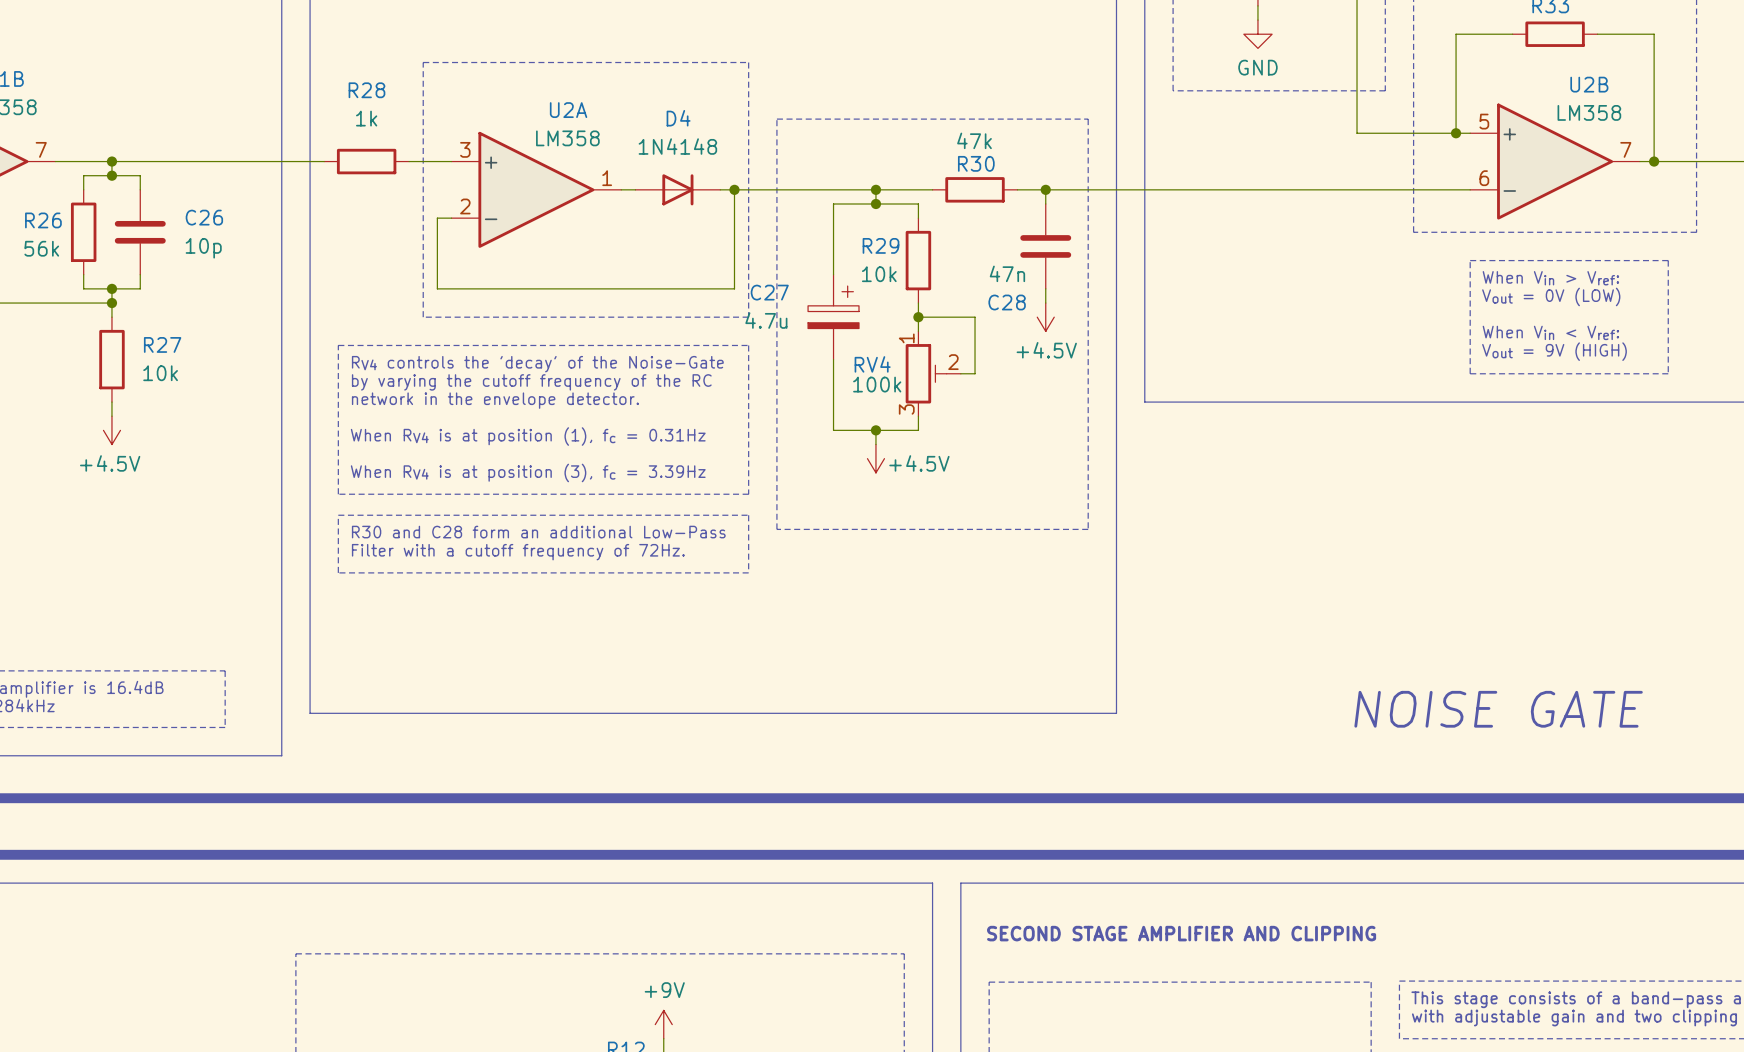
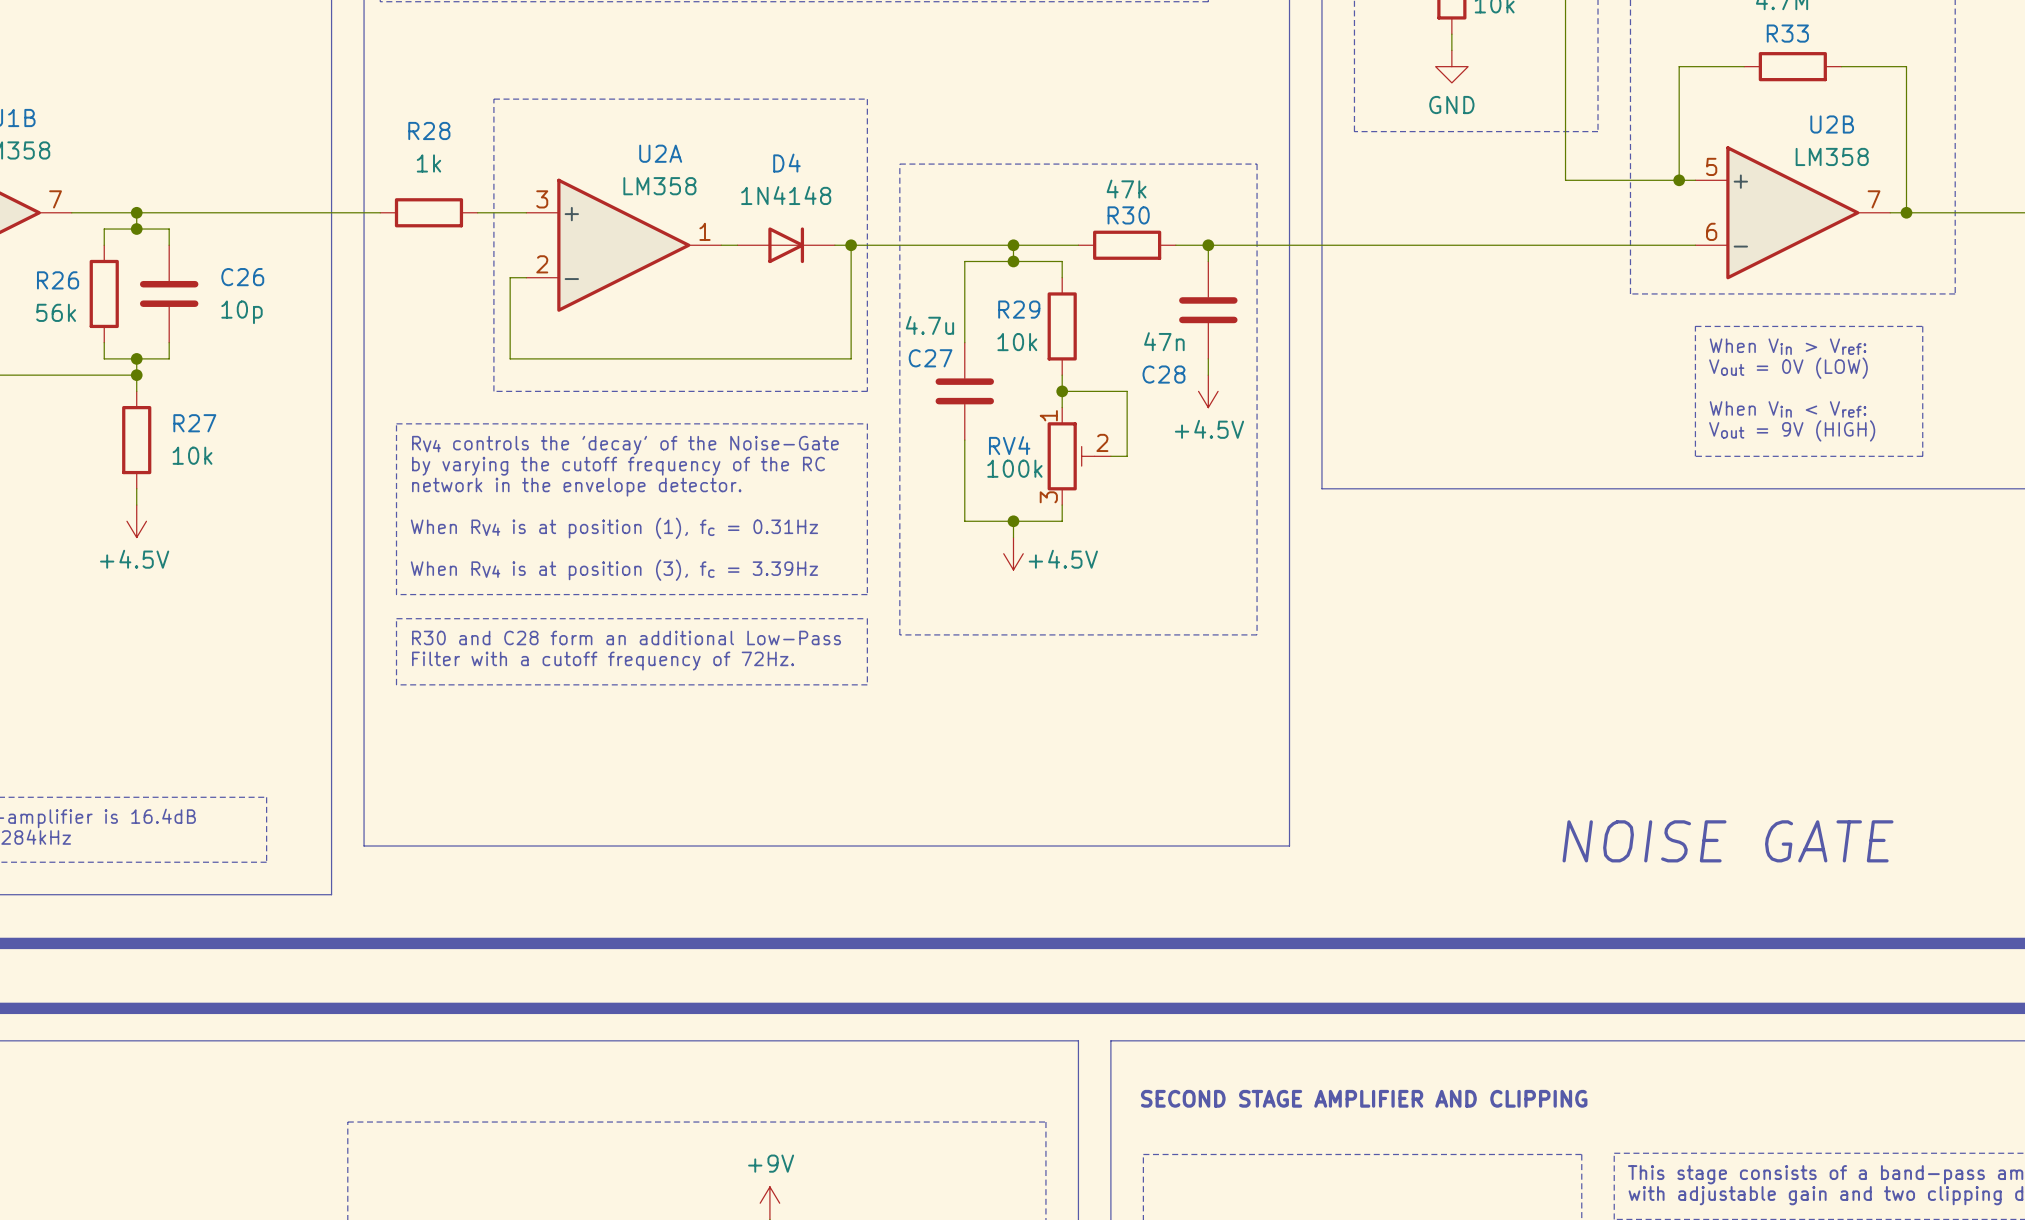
C27 symbol: [808, 274, 859, 360] -> [935, 342, 995, 441]
C27 name position: C27 (769, 292) -> C27 (930, 358)
C27 value position: 4.7u (766, 320) -> 4.7u (929, 325)

